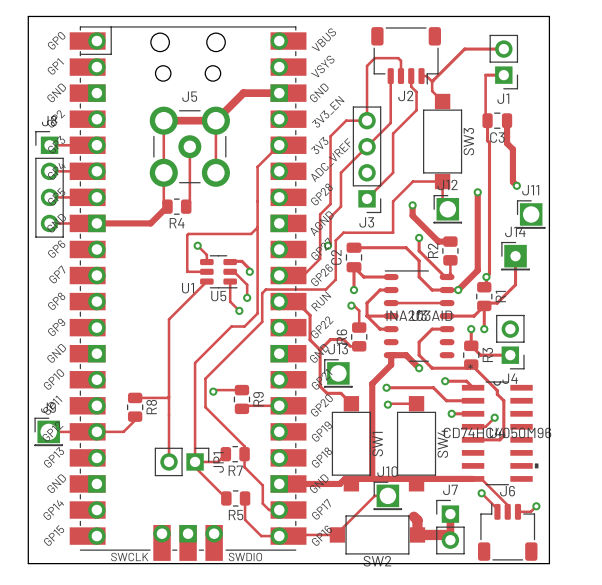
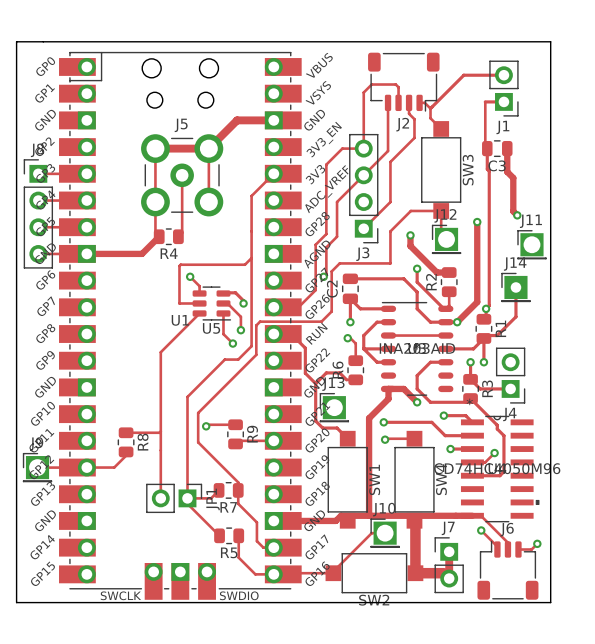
track: (413, 516) (417, 520) -> (414, 520) (415, 558)

